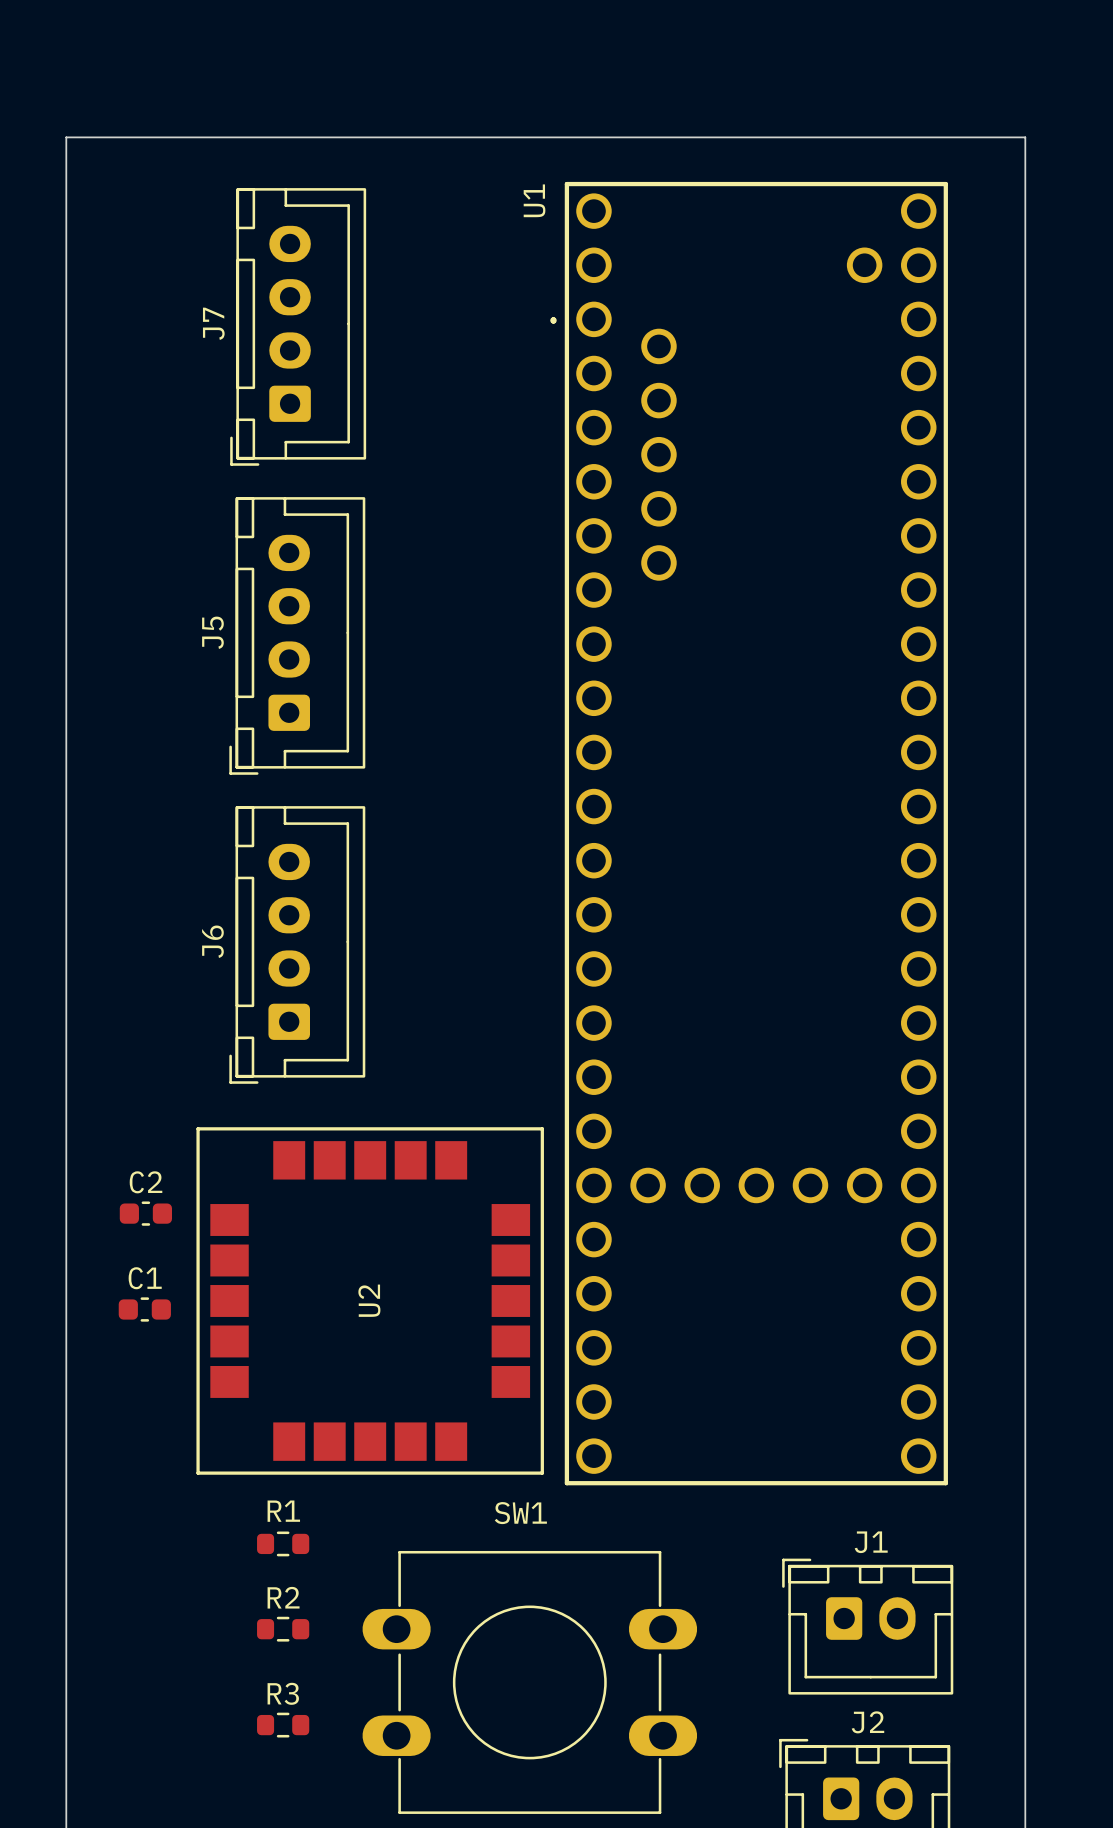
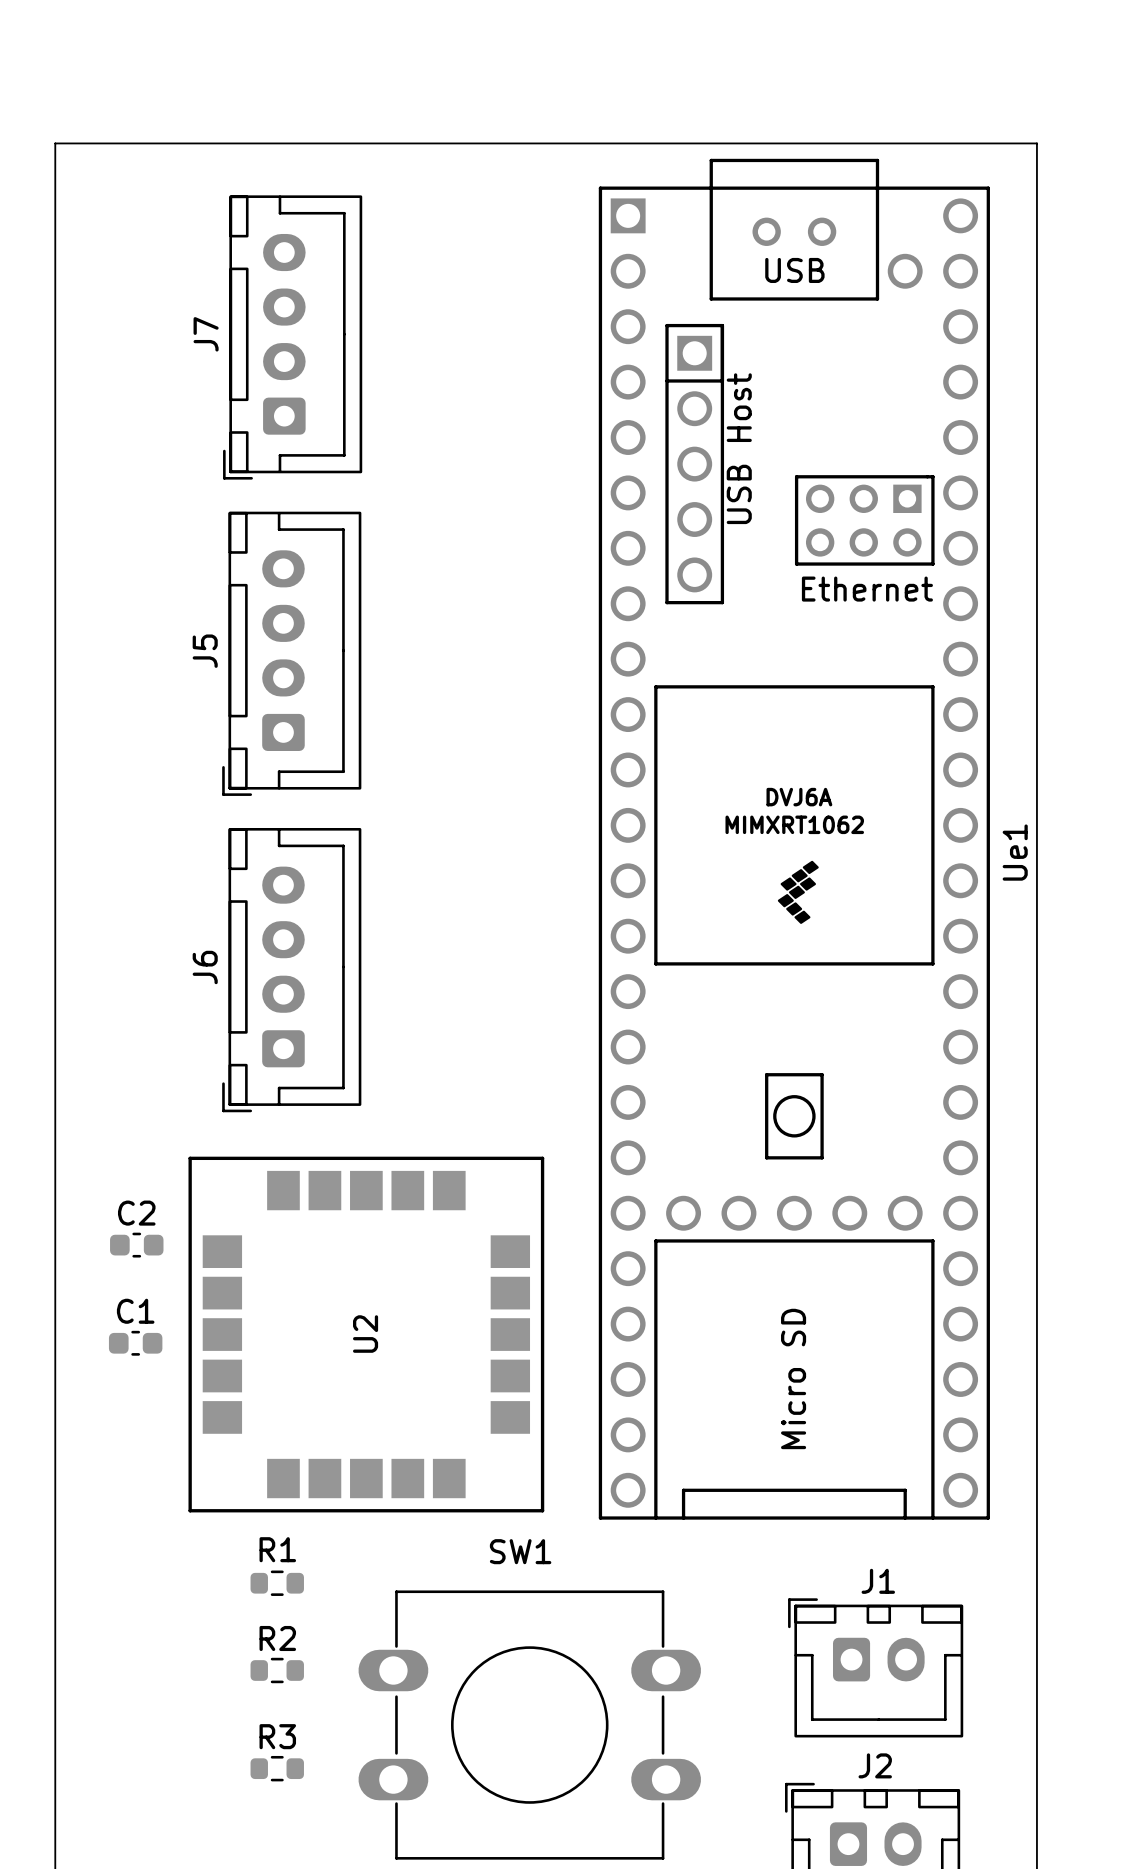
Ue1: none -> (794, 839)
U1: (749, 833) -> none

